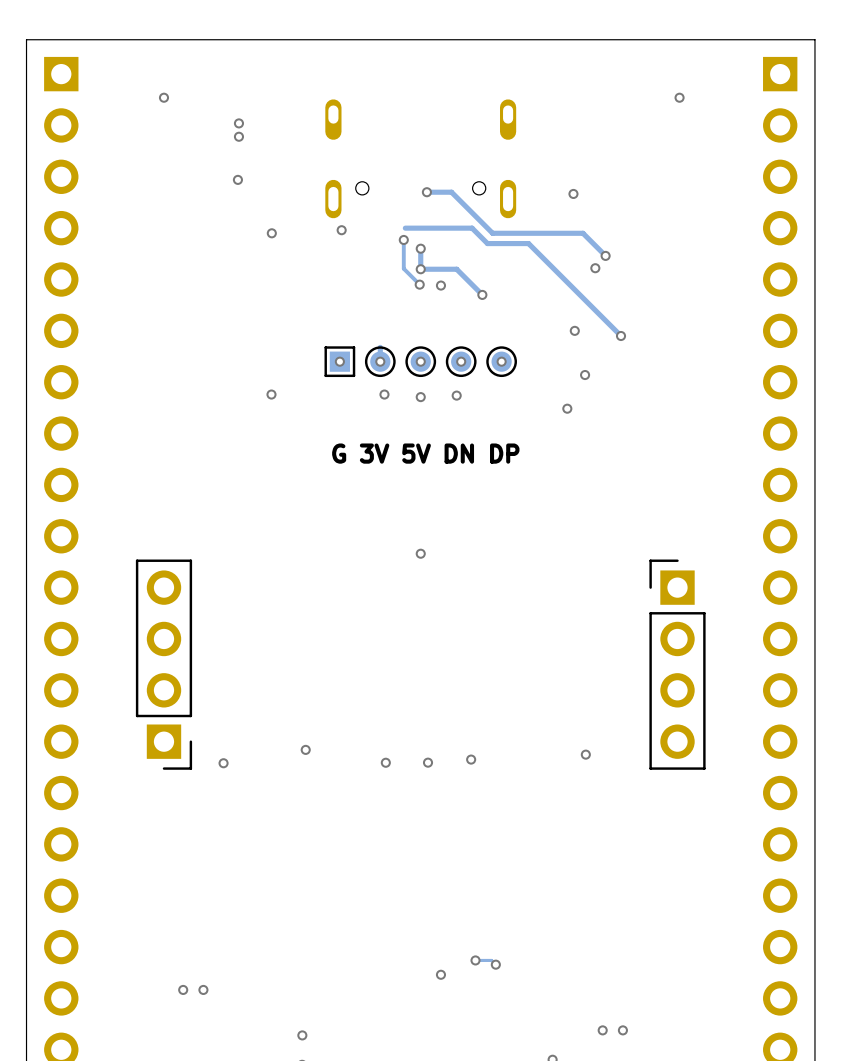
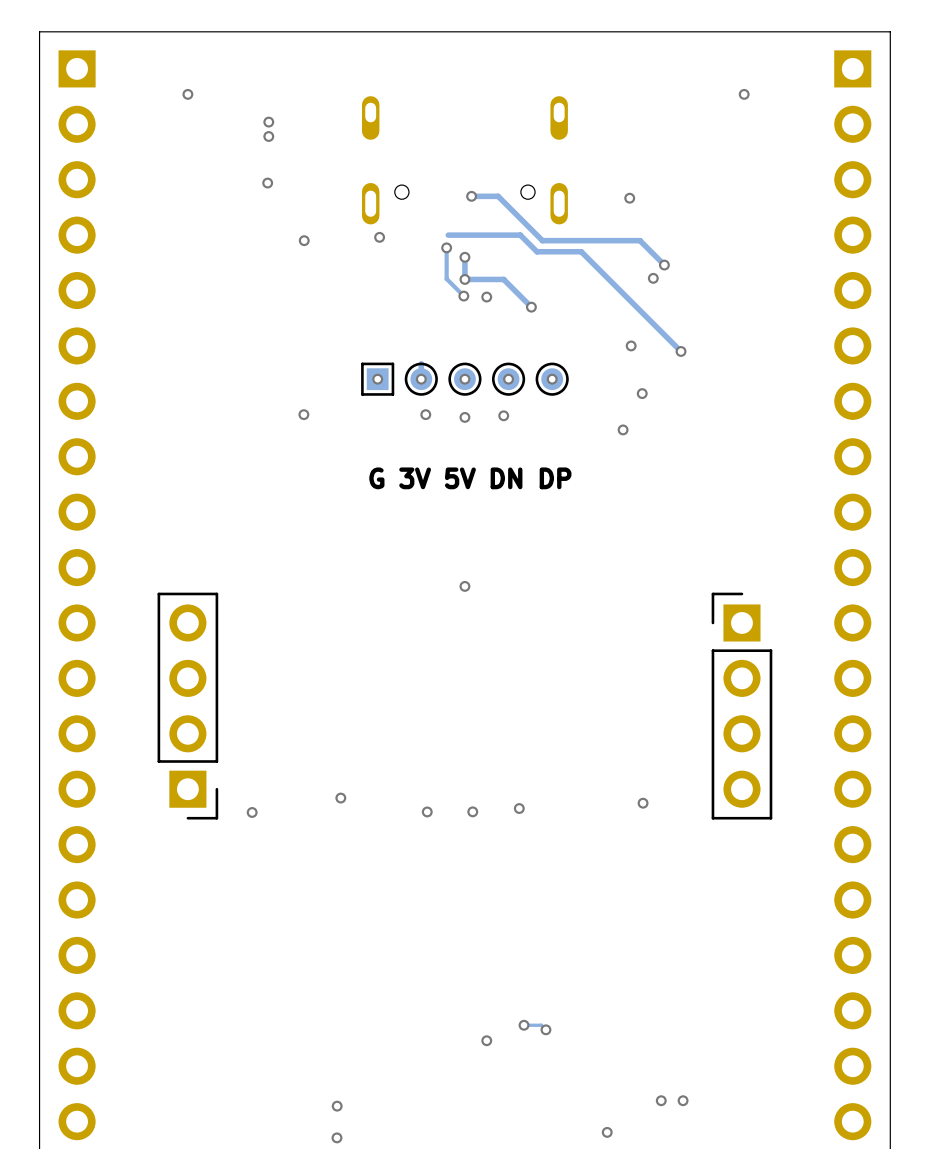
via: (183, 989) -> none
via: (203, 989) -> none

